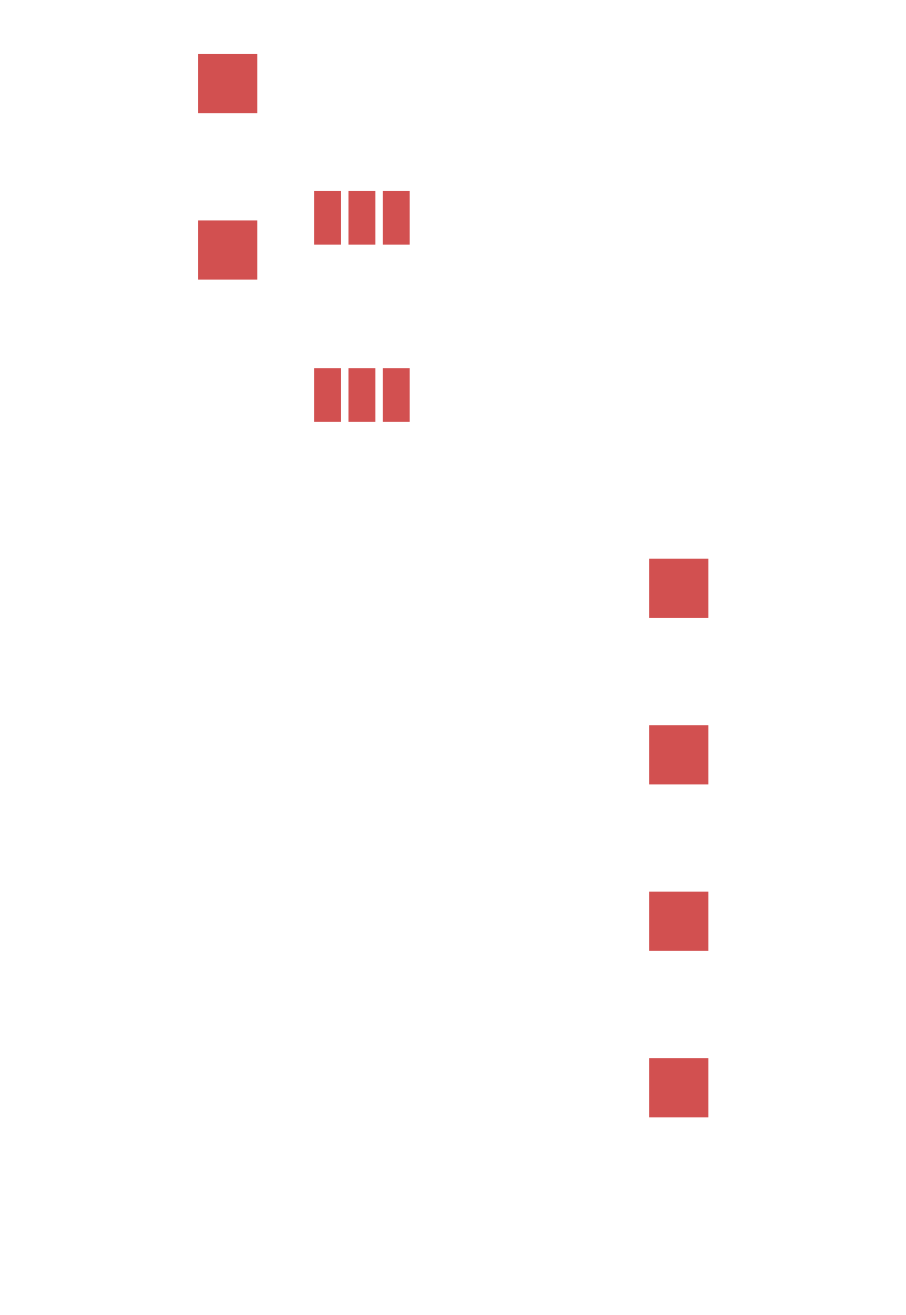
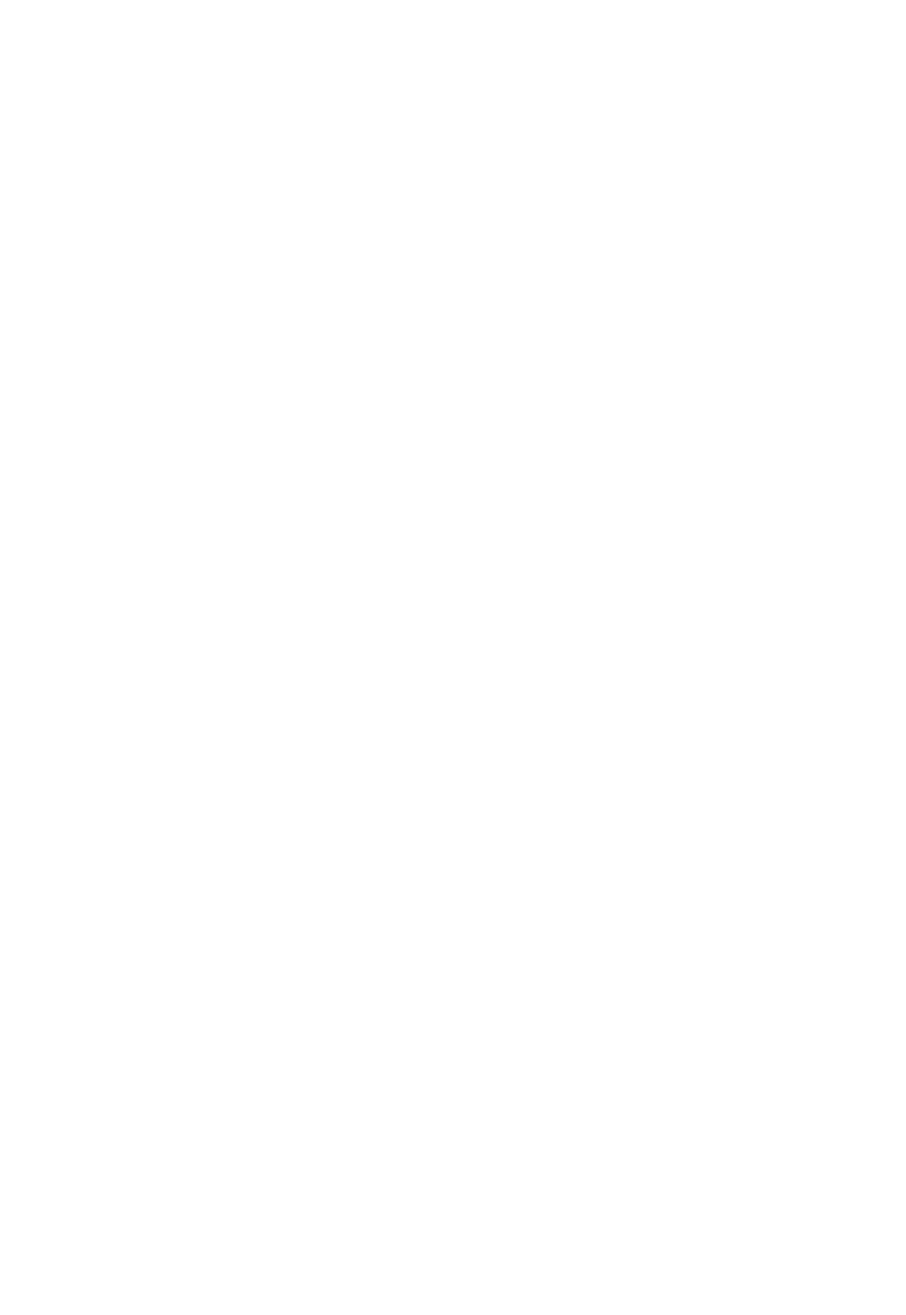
part: (227, 83) -> none
part: (361, 217) -> none
part: (227, 250) -> none
part: (361, 395) -> none
part: (678, 588) -> none
part: (678, 754) -> none
part: (678, 921) -> none
part: (678, 1087) -> none

